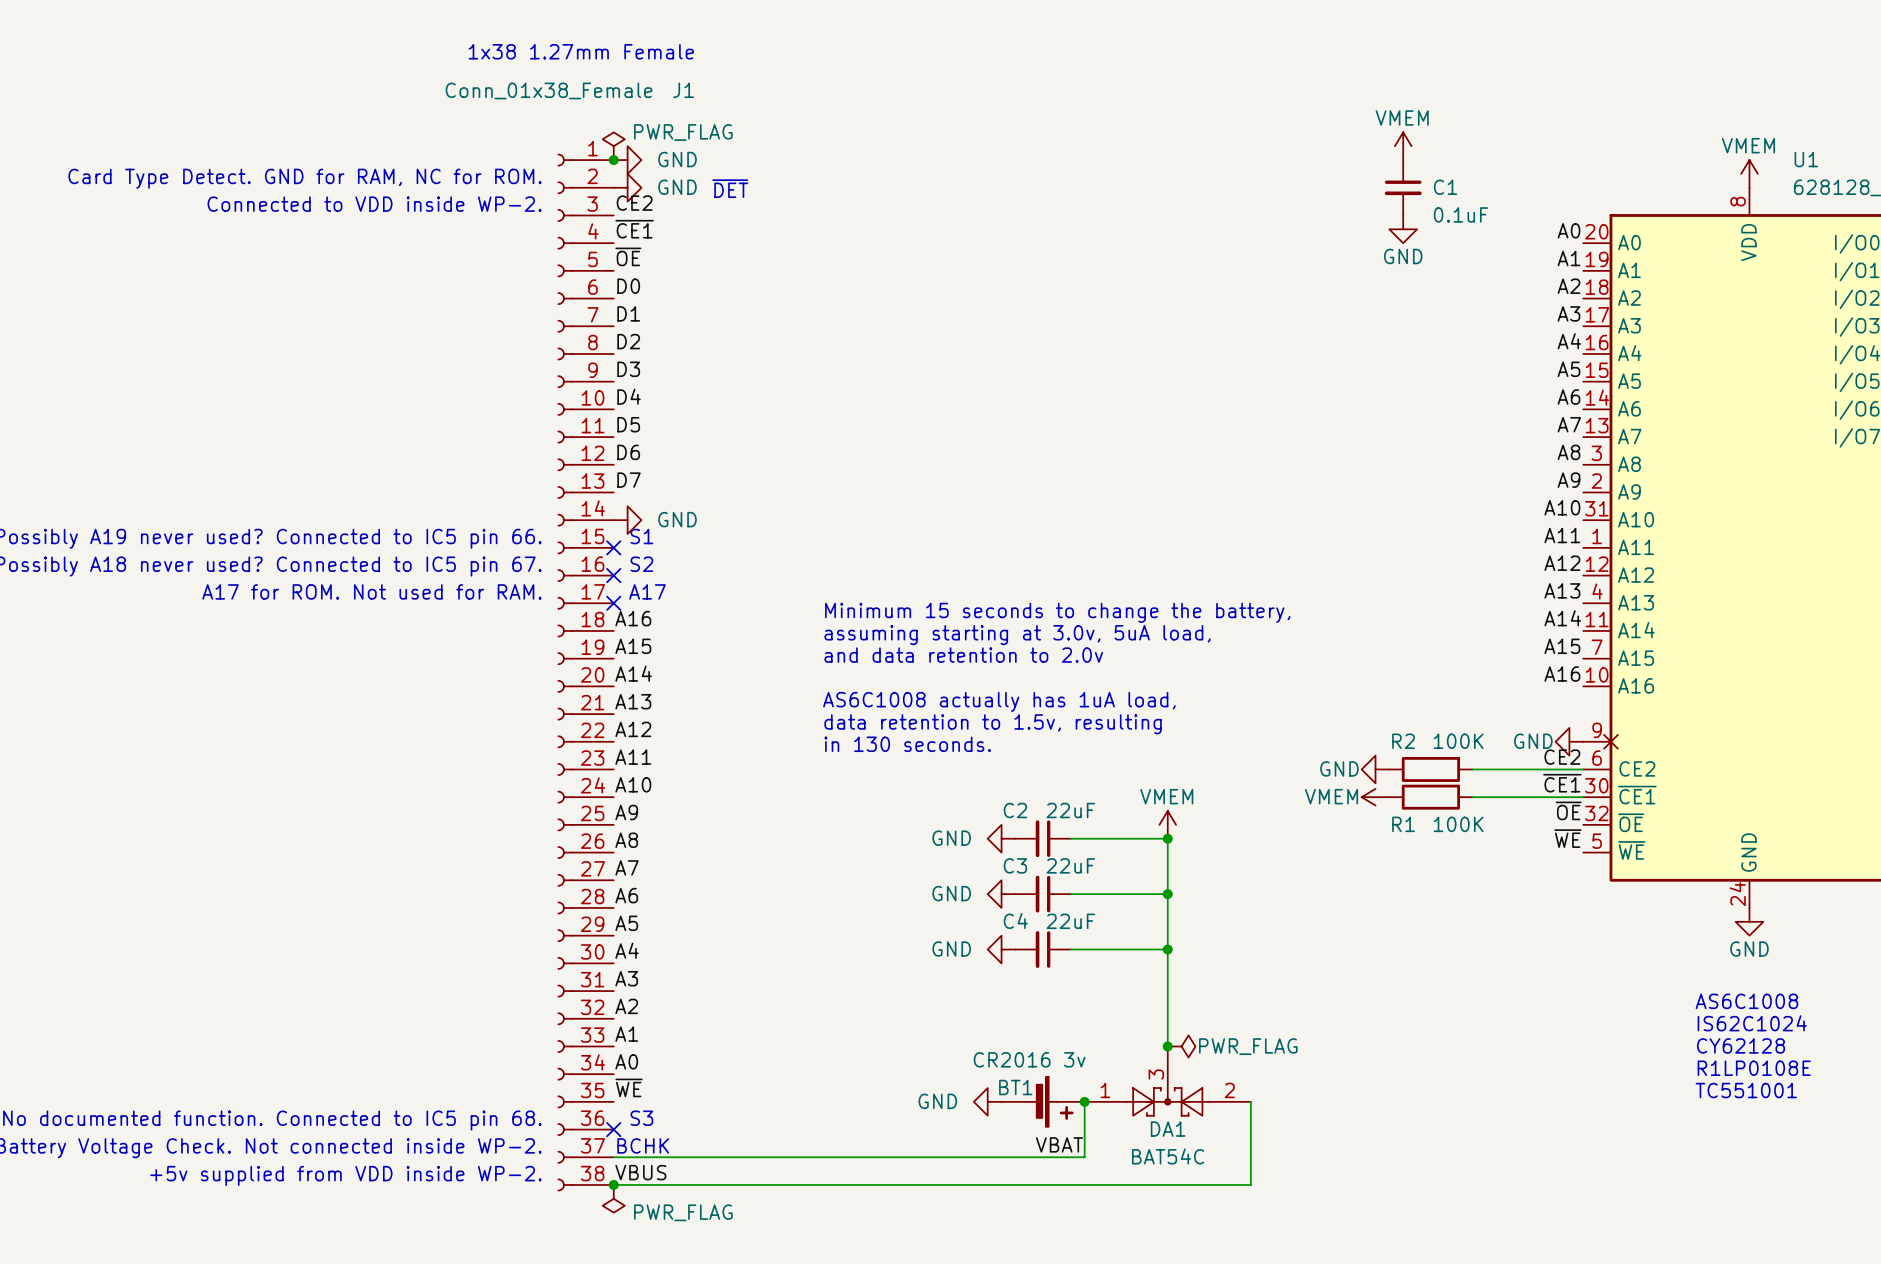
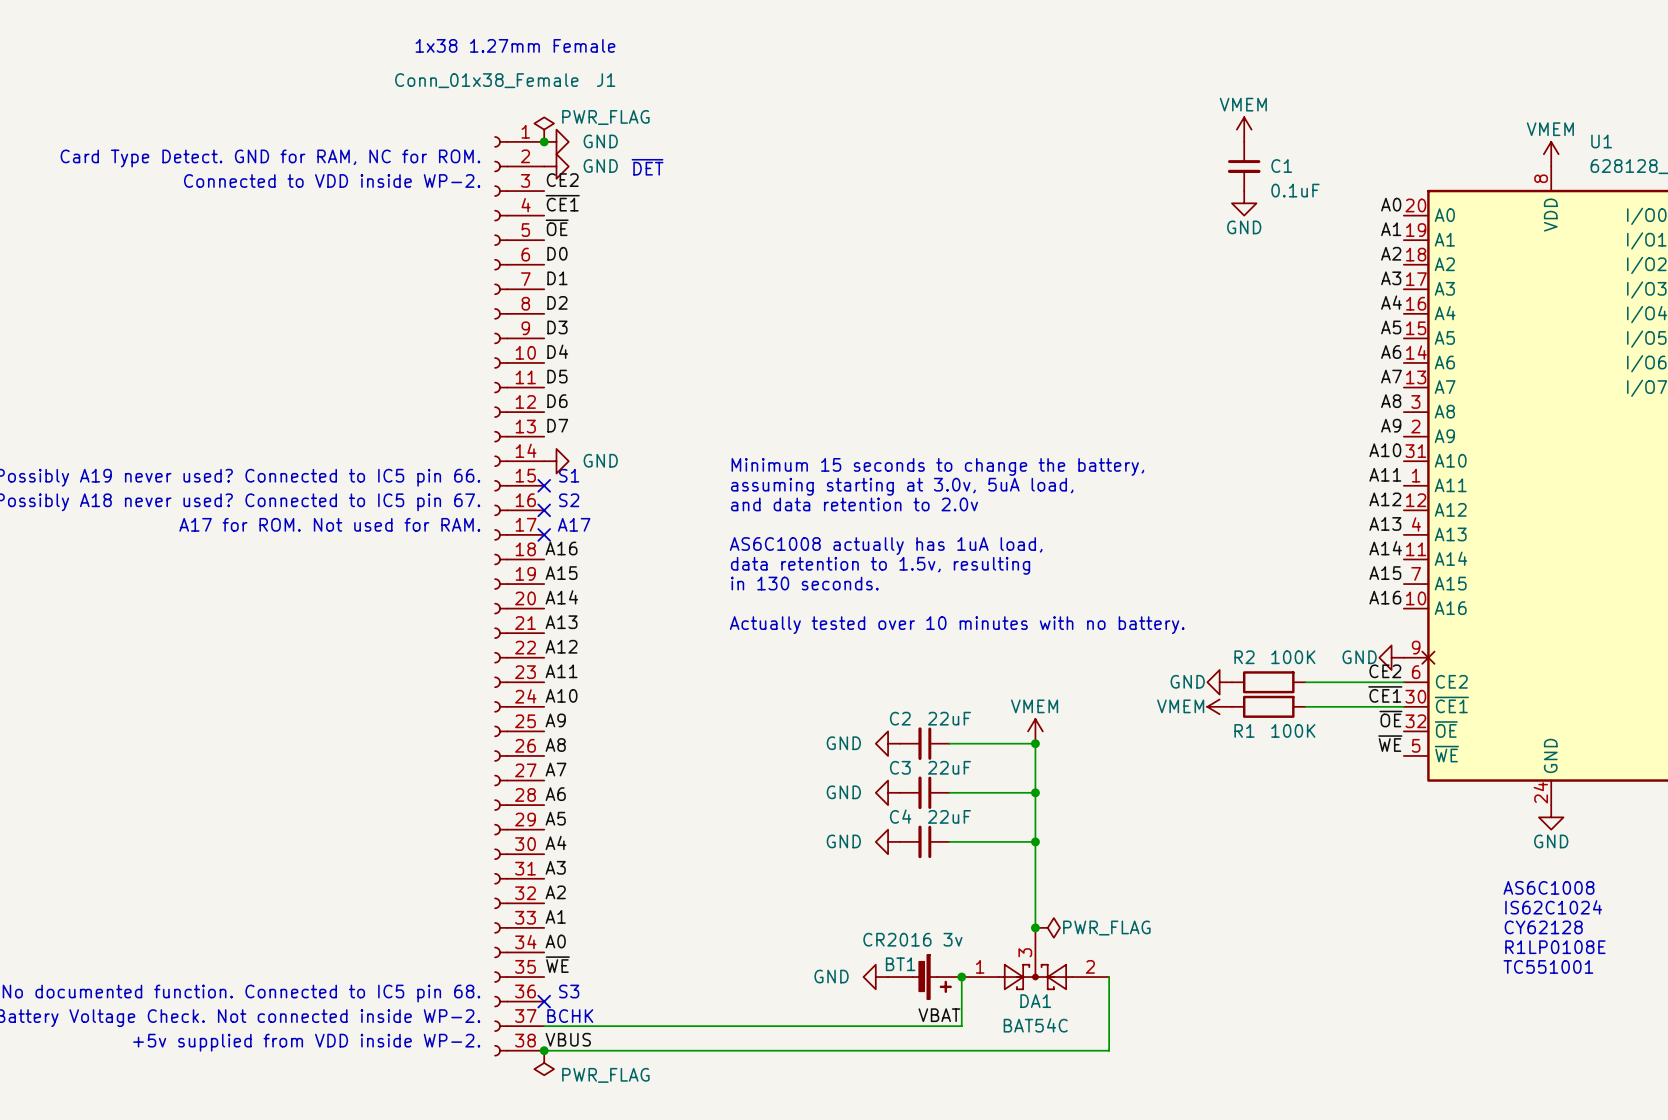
text: none -> Minimum 15 seconds to change the battery, (937, 466)
text: none -> assuming starting at 3.0v, 5uA load, (902, 486)
text: none -> and data retention to 2.0v (854, 504)
text: Minimum 15 seconds to change the battery, (1057, 612) -> AS6C1008 actually has 1uA load, (886, 546)
text: assuming starting at 3.0v, 5uA load, (1017, 635) -> data retention to 1.5v, resulting (880, 565)
text: and data retention to 2.0v (963, 655) -> in 130 seconds. (804, 583)
text: AS6C1008 actually has 1uA load, (999, 701) -> Actually tested over 10 minutes with no battery. (957, 625)
text: data retention to 1.5v, resulting (993, 724) -> none
text: in 130 seconds. (907, 744) -> none

